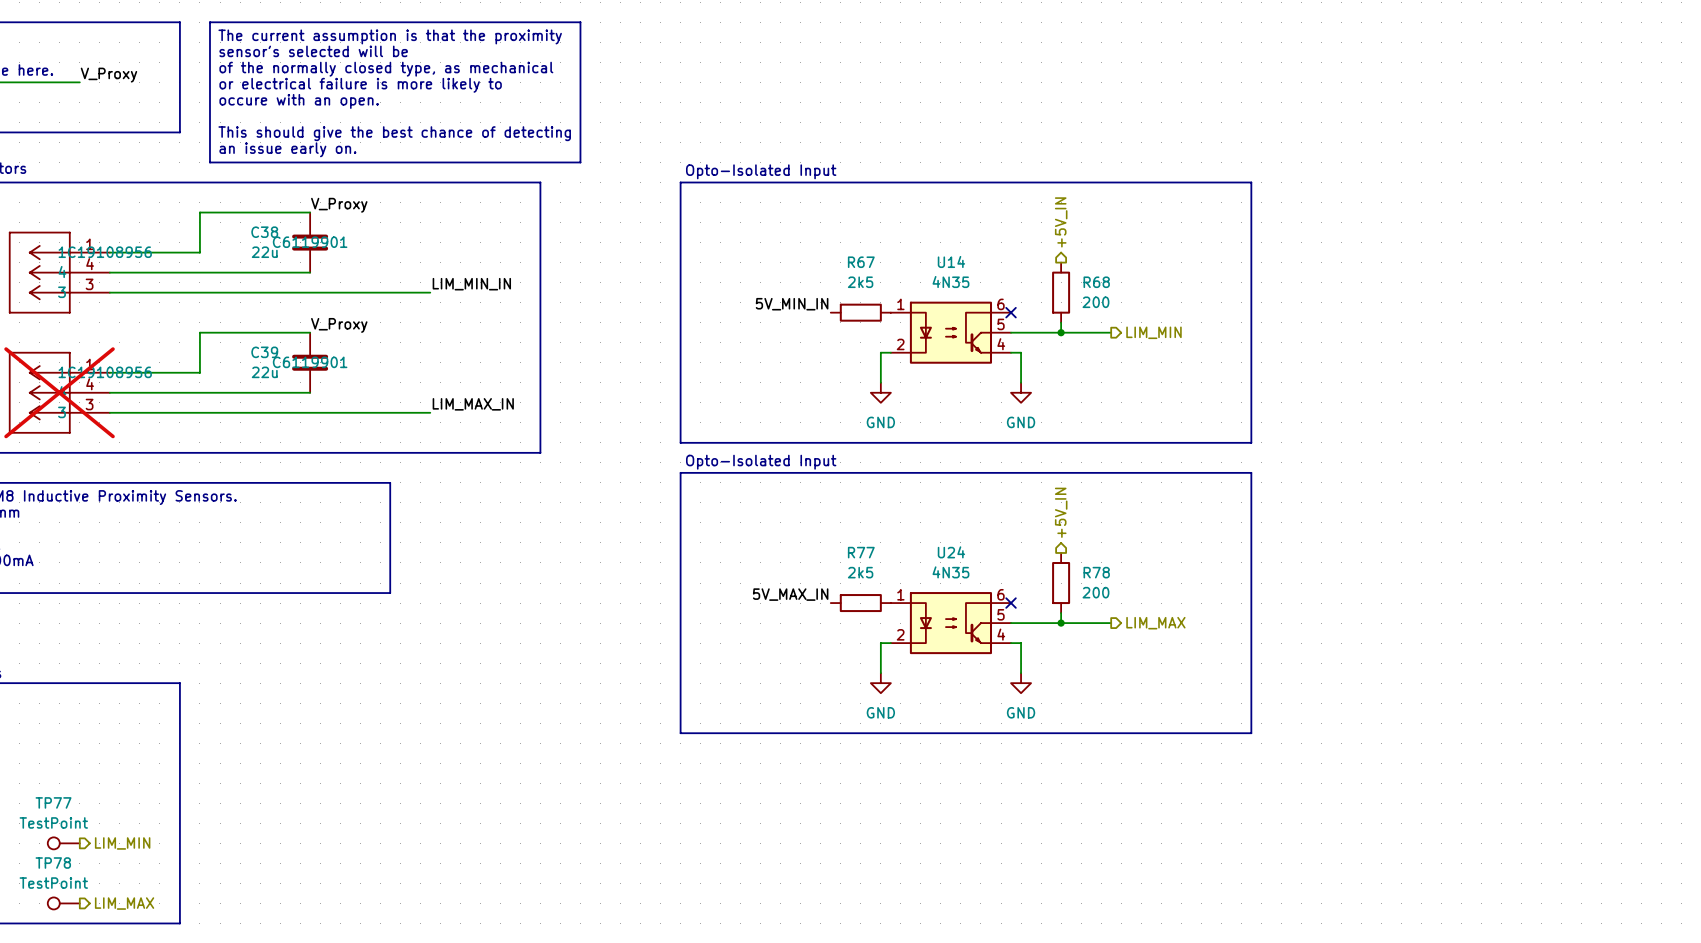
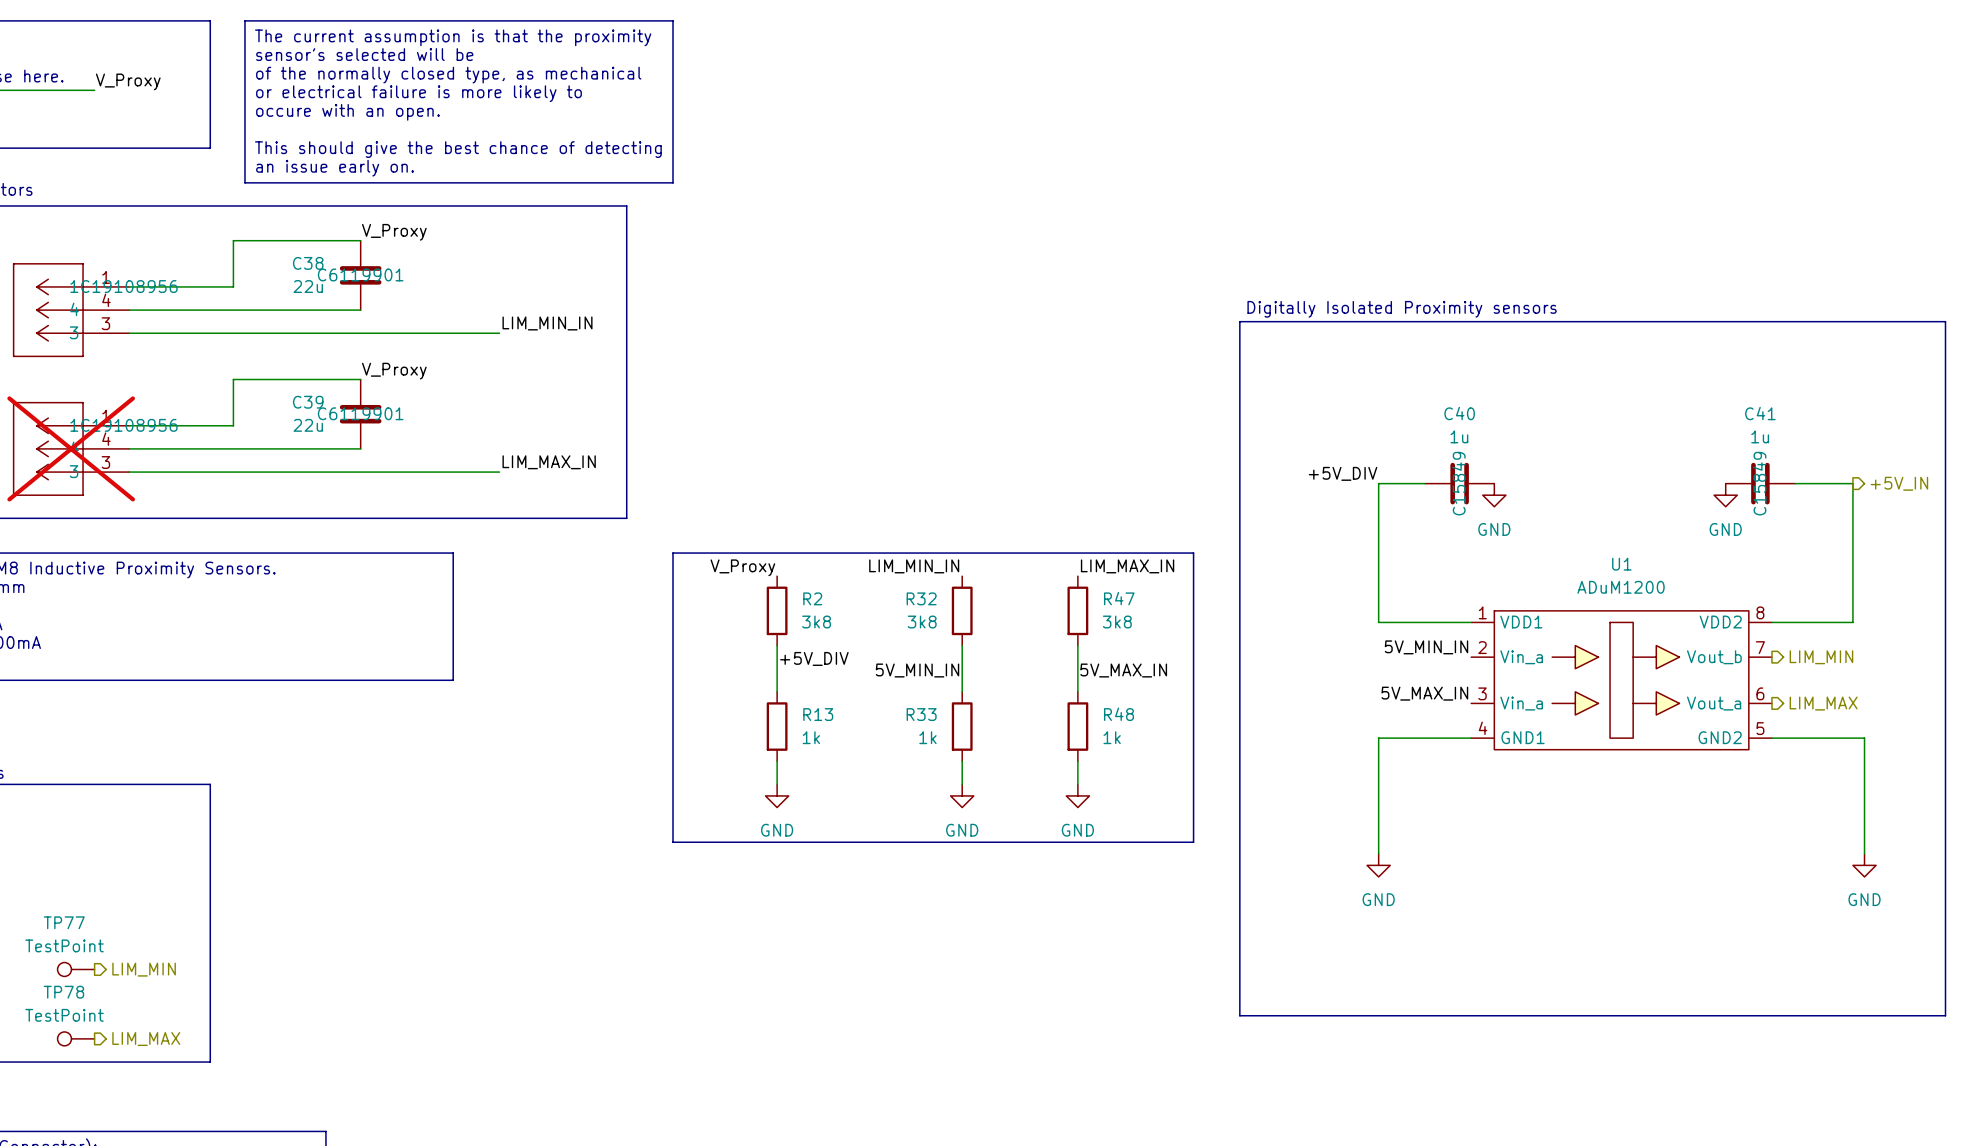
text: Opto-Isolated Input (761, 171) -> none
line: (680, 182) (680, 442) (1251, 442) (1251, 182) (680, 182) -> none
hierarchical label: +5V_IN (1061, 222) -> none
text: none -> Digitally Isolated Proximity sensors (1402, 309)
line: none -> (1239, 321) (1945, 321) (1945, 1015) (1239, 1015) (1239, 321)
R68: 200 (1061, 292) -> none
label: 5V_MIN_IN (792, 304) -> none
R67: 2k5 (860, 312) -> none
no-connect mark: (1011, 312) -> none
wire: (1061, 322) (1061, 332) -> none
U14: 4N35 (950, 332) -> none
wire: (1011, 332) (1111, 332) -> none
junction: (1061, 332) -> none
hierarchical label: LIM_MIN (1153, 332) -> none
wire: (890, 352) (880, 352) (880, 382) -> none
wire: (1011, 352) (1021, 352) (1021, 382) -> none
power symbol: GND (880, 392) -> none
power symbol: GND (1021, 392) -> none
label: none -> +5V_DIV (1343, 473)
wire: none -> (1424, 483) (1378, 483) (1378, 622) (1471, 622)
C40: none -> 1u (1459, 483)
C41: none -> 1u (1760, 483)
wire: none -> (1795, 483) (1852, 483) (1852, 622) (1771, 622)
hierarchical label: none -> +5V_IN (1899, 483)
power symbol: none -> GND (1494, 495)
power symbol: none -> GND (1725, 495)
text: Opto-Isolated Input (761, 462) -> none
label: none -> LIM_MIN_IN (914, 566)
label: none -> LIM_MAX_IN (1127, 566)
label: none -> V_Proxy (742, 567)
hierarchical label: +5V_IN (1061, 512) -> none
R2: none -> 3k8 (777, 610)
R32: none -> 3k8 (962, 610)
R47: none -> 3k8 (1077, 610)
wire: none -> (777, 645) (777, 691)
wire: none -> (962, 645) (962, 691)
wire: none -> (1077, 645) (1077, 691)
label: none -> 5V_MIN_IN (1426, 647)
hierarchical label: none -> LIM_MIN (1821, 657)
label: none -> +5V_DIV (814, 658)
R78: 200 (1061, 583) -> none
label: none -> 5V_MIN_IN (917, 670)
U1: none -> ADuM1200 (1621, 680)
label position: 5V_MAX_IN (790, 594) -> 5V_MAX_IN (1123, 670)
R77: 2k5 (860, 603) -> none
no-connect mark: (1011, 603) -> none
label: none -> 5V_MAX_IN (1424, 693)
wire: (1061, 613) (1061, 623) -> none
hierarchical label: none -> LIM_MAX (1823, 703)
U24: 4N35 (950, 623) -> none
wire: (1011, 623) (1111, 623) -> none
junction: (1061, 623) -> none
hierarchical label: LIM_MAX (1155, 623) -> none
R13: none -> 1k (777, 726)
R33: none -> 1k (962, 726)
R48: none -> 1k (1077, 726)
wire: (890, 643) (880, 643) (880, 673) -> none
wire: (1011, 643) (1021, 643) (1021, 673) -> none
wire: none -> (1471, 738) (1378, 738) (1378, 853)
wire: none -> (1771, 738) (1864, 738) (1864, 853)
wire: none -> (777, 761) (777, 784)
wire: none -> (962, 761) (962, 784)
wire: none -> (1077, 761) (1077, 784)
power symbol: GND (880, 683) -> none
power symbol: GND (1021, 683) -> none
power symbol: none -> GND (777, 795)
power symbol: none -> GND (962, 795)
power symbol: none -> GND (1077, 795)
line: (680, 733) (680, 472) (1251, 472) (1251, 733) (1031, 733) -> (788, 842) (673, 842) (673, 553) (1193, 553) (1193, 842)
power symbol: none -> GND (1378, 865)
power symbol: none -> GND (1864, 865)

